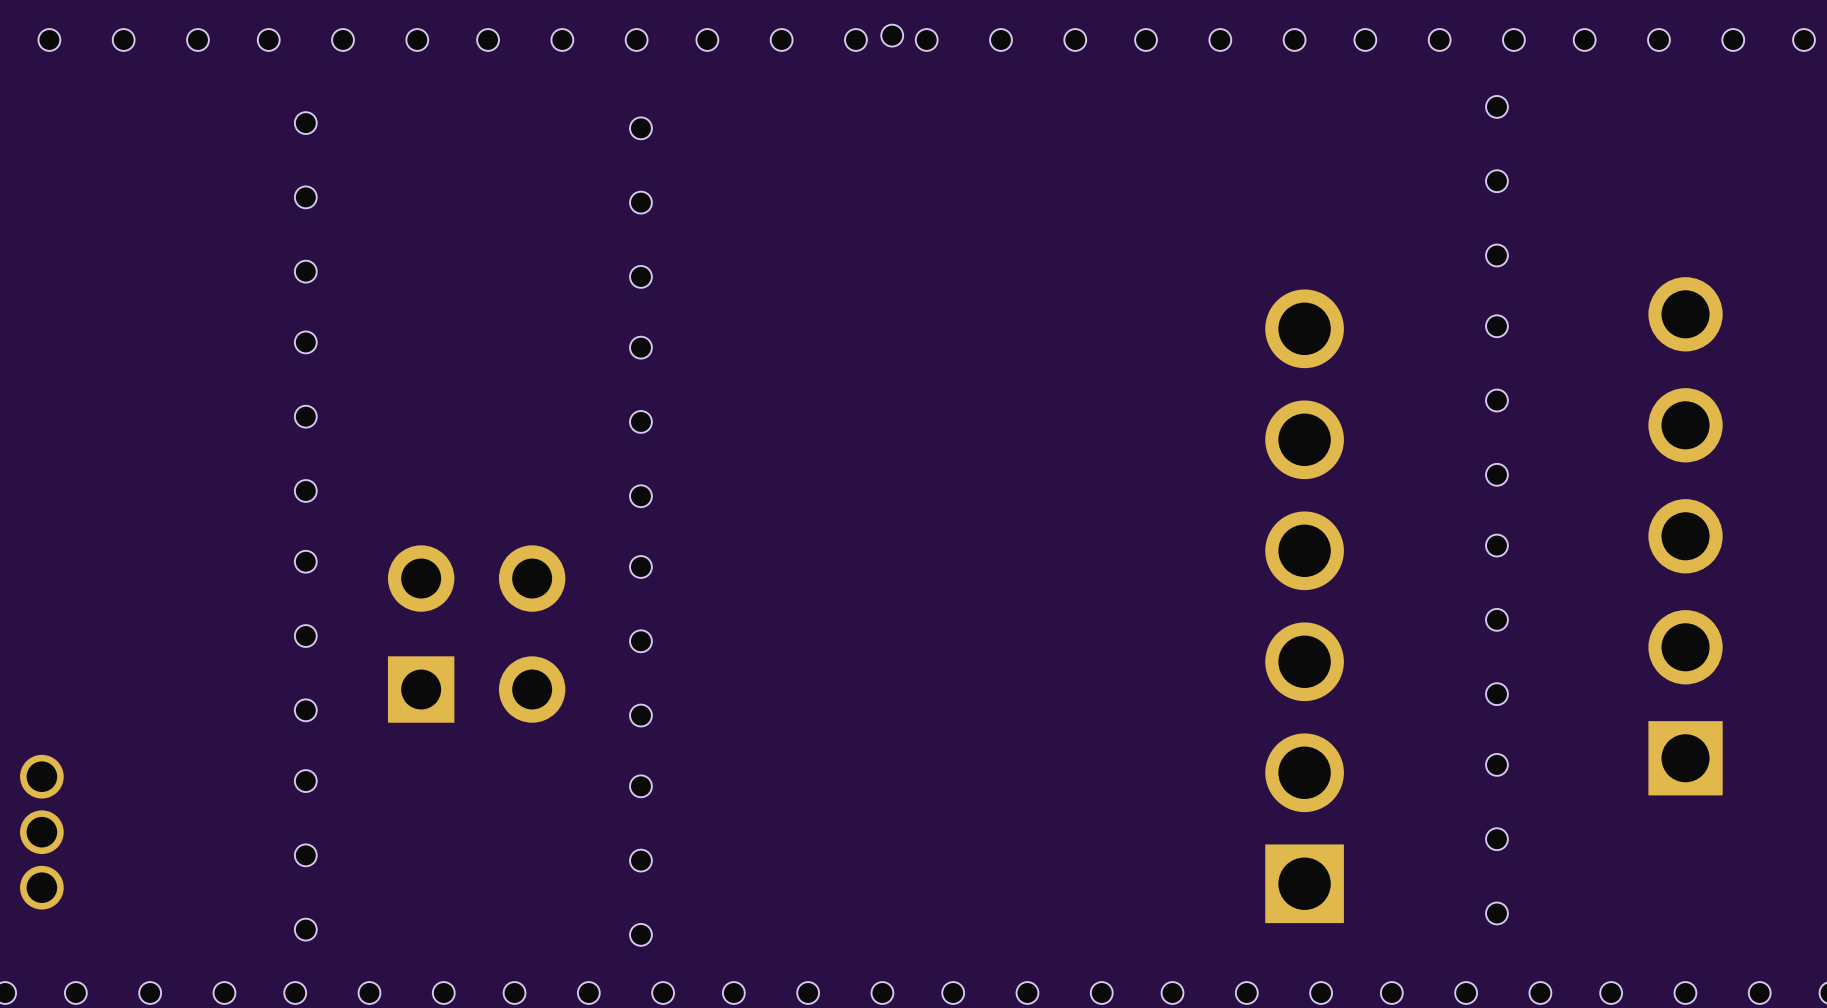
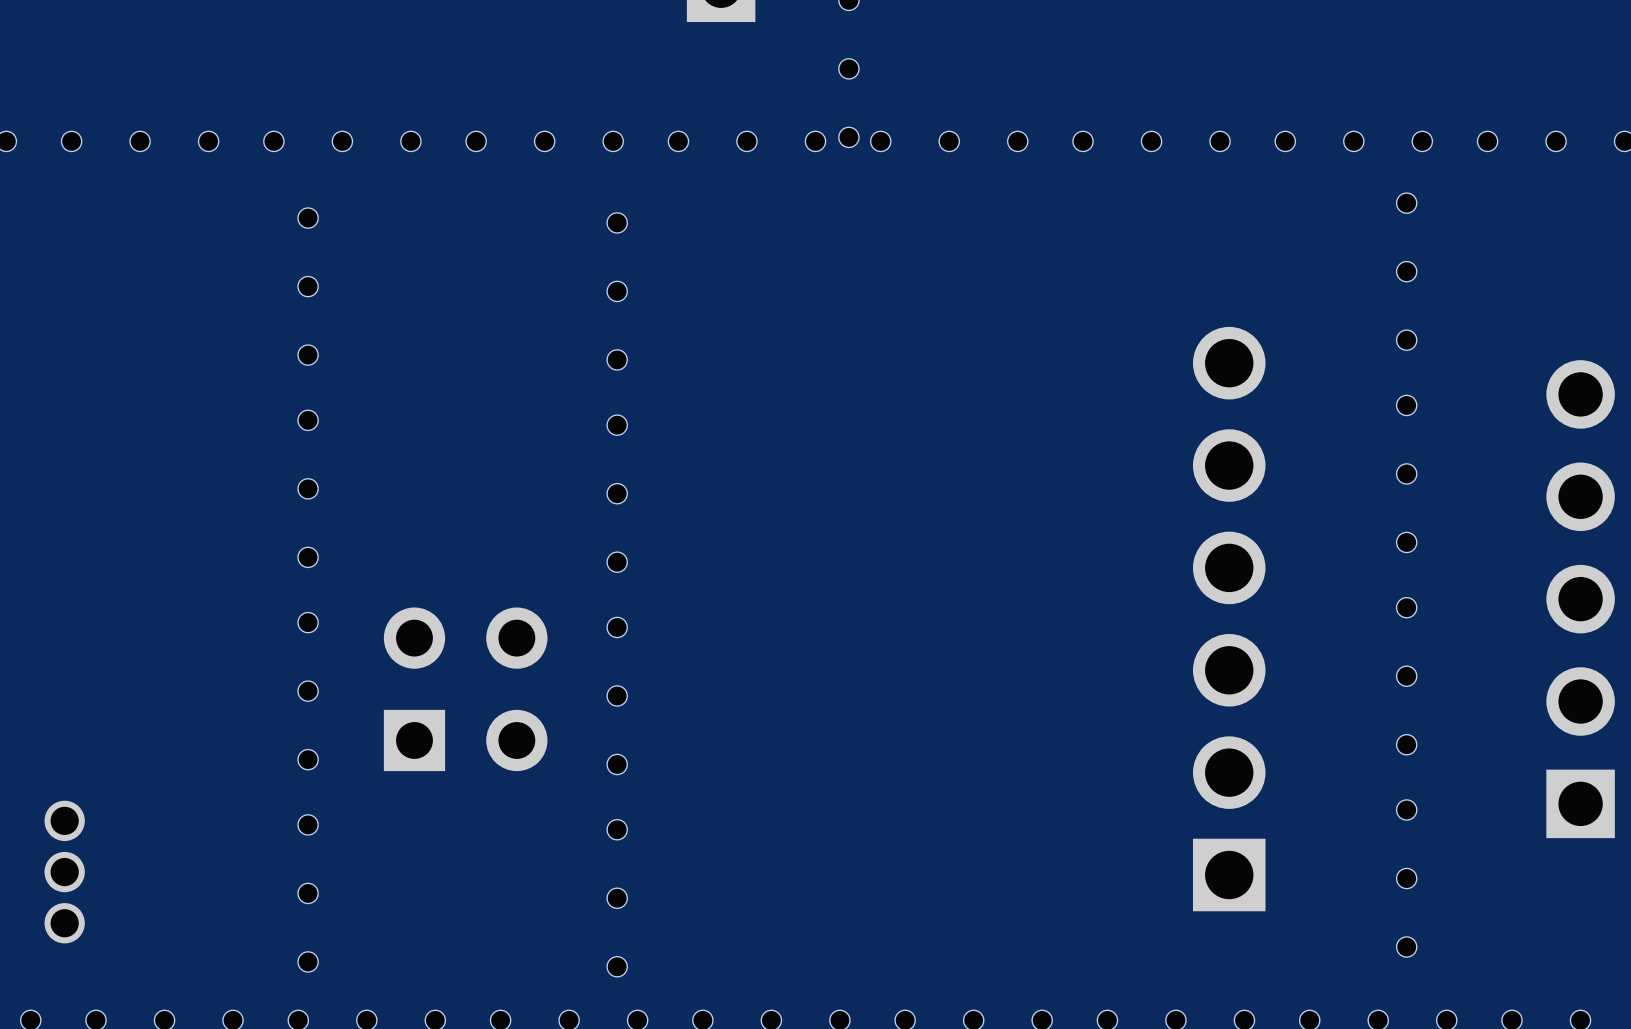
part position: (1304, 606) -> (1229, 619)

